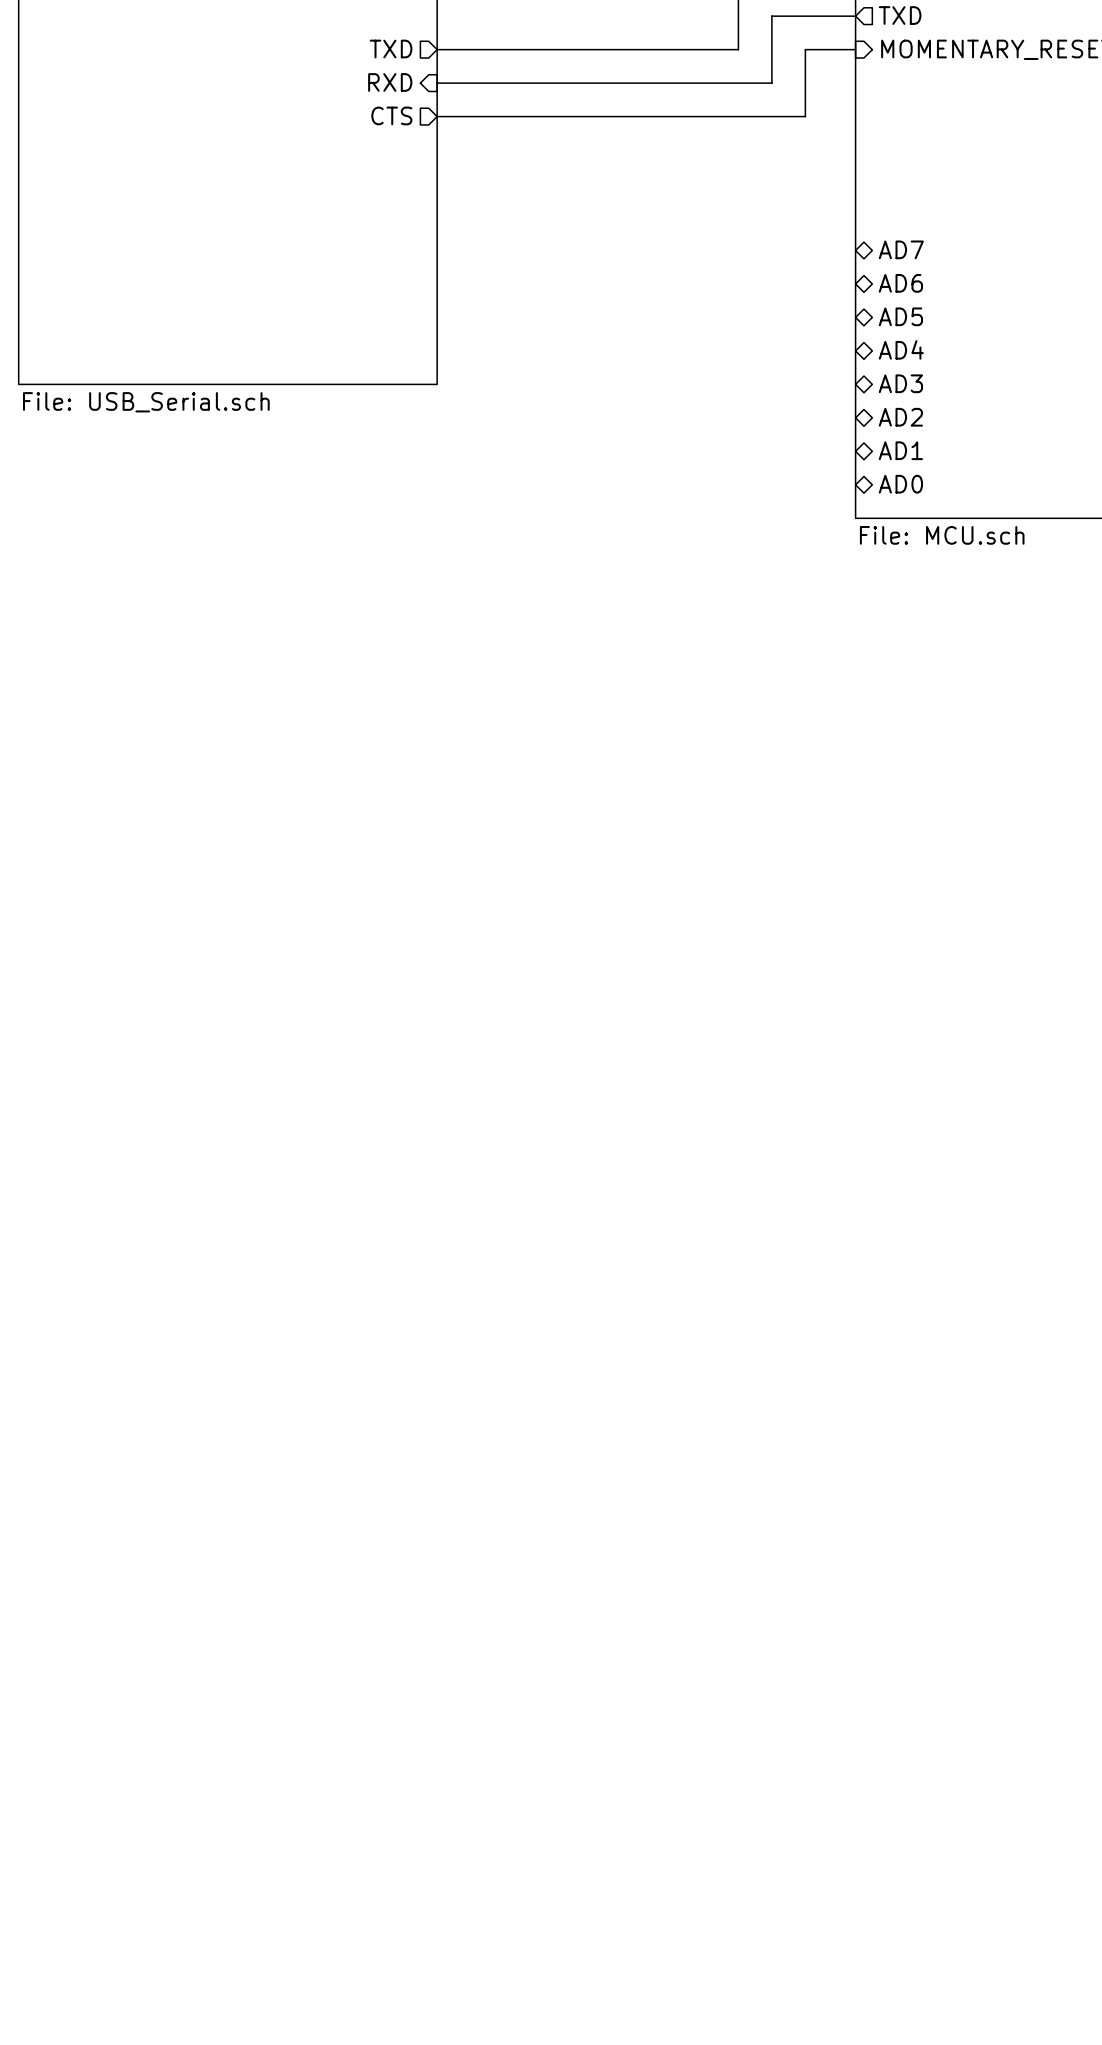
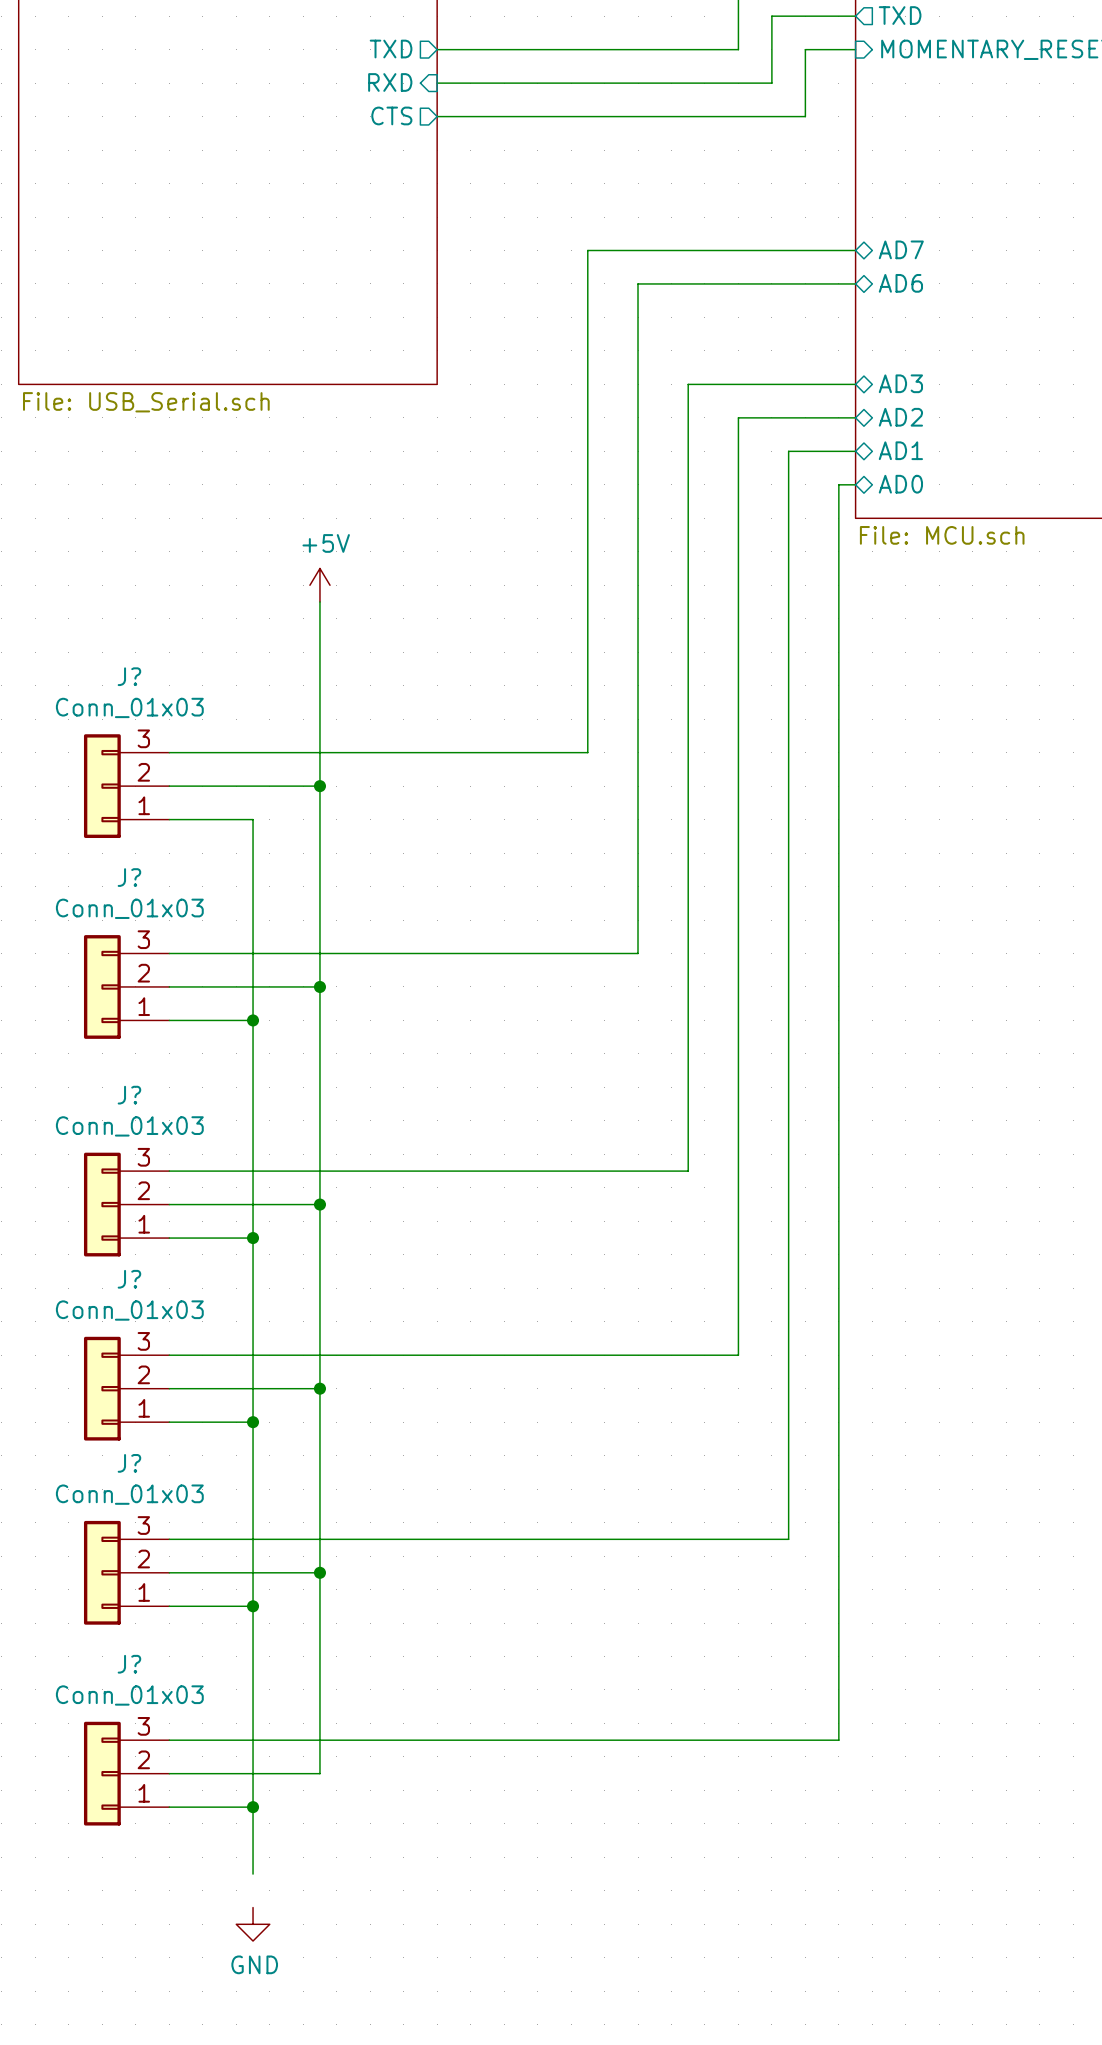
wire: none -> (855, 250) (587, 250) (587, 752) (169, 752)
wire: none -> (855, 283) (638, 283) (638, 953) (169, 953)
sheet pin: AD5 (900, 316) -> none
sheet pin: AD4 (901, 349) -> none
wire: none -> (855, 384) (688, 384) (688, 1171) (169, 1171)
wire: none -> (855, 417) (738, 417) (738, 1355) (169, 1355)
wire: none -> (855, 451) (788, 451) (788, 1539) (169, 1539)
wire: none -> (855, 484) (838, 484) (838, 1740) (169, 1740)
power symbol: none -> +5V (319, 585)
wire: none -> (319, 601) (319, 1773) (169, 1773)
J?: none -> Conn_01x03 (126, 786)
wire: none -> (169, 786) (319, 786)
junction: none -> (319, 786)
wire: none -> (169, 819) (253, 819) (253, 1874)
J?: none -> Conn_01x03 (126, 986)
wire: none -> (169, 986) (319, 986)
junction: none -> (319, 986)
wire: none -> (169, 1020) (253, 1020)
junction: none -> (253, 1020)
J?: none -> Conn_01x03 (126, 1204)
wire: none -> (169, 1204) (319, 1204)
junction: none -> (319, 1204)
wire: none -> (169, 1238) (253, 1238)
junction: none -> (253, 1238)
J?: none -> Conn_01x03 (126, 1388)
wire: none -> (169, 1388) (319, 1388)
junction: none -> (319, 1388)
wire: none -> (169, 1422) (253, 1422)
junction: none -> (253, 1422)
J?: none -> Conn_01x03 (126, 1572)
wire: none -> (169, 1572) (319, 1572)
junction: none -> (319, 1572)
wire: none -> (169, 1606) (253, 1606)
junction: none -> (253, 1606)
J?: none -> Conn_01x03 (126, 1773)
wire: none -> (169, 1807) (253, 1807)
junction: none -> (253, 1807)
power symbol: none -> GND (253, 1924)

